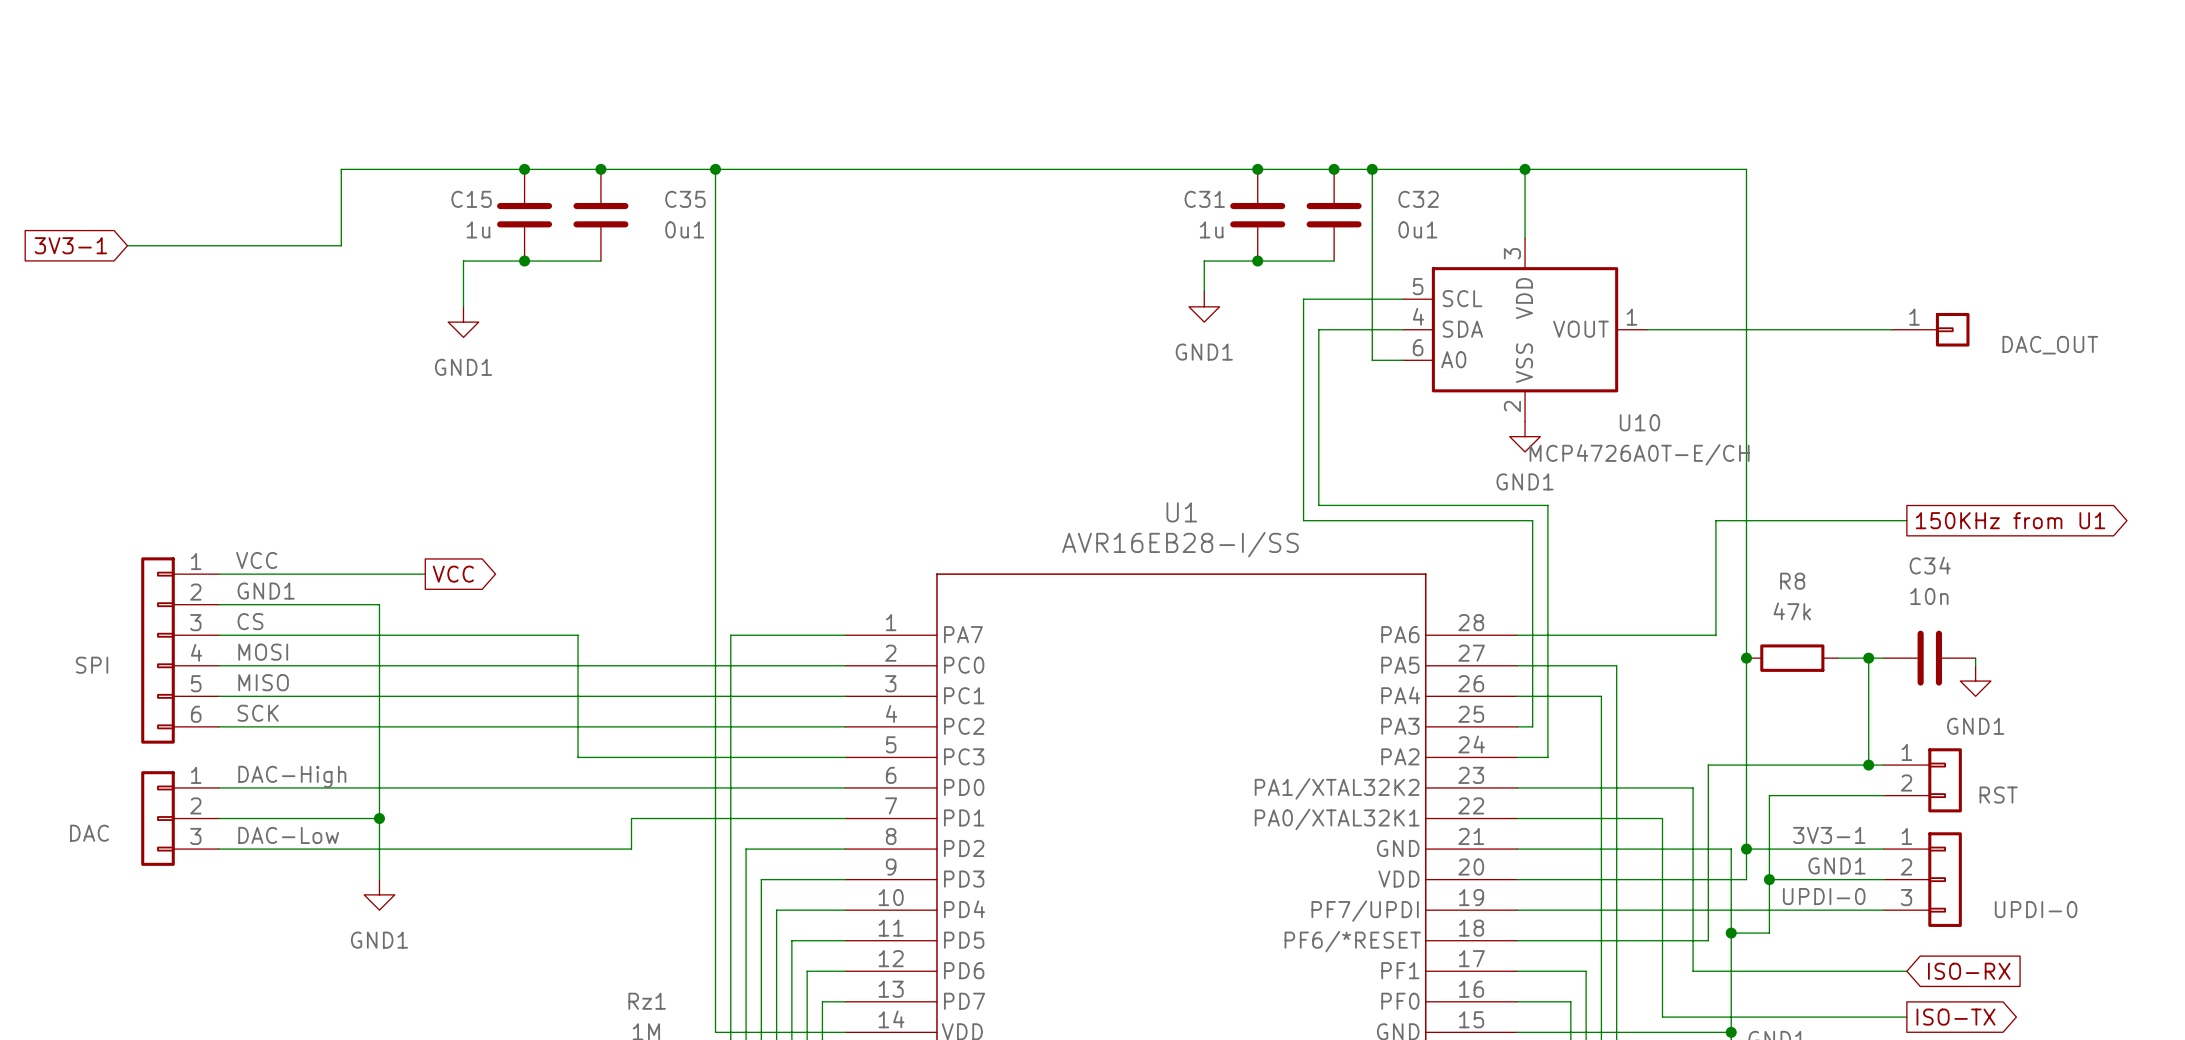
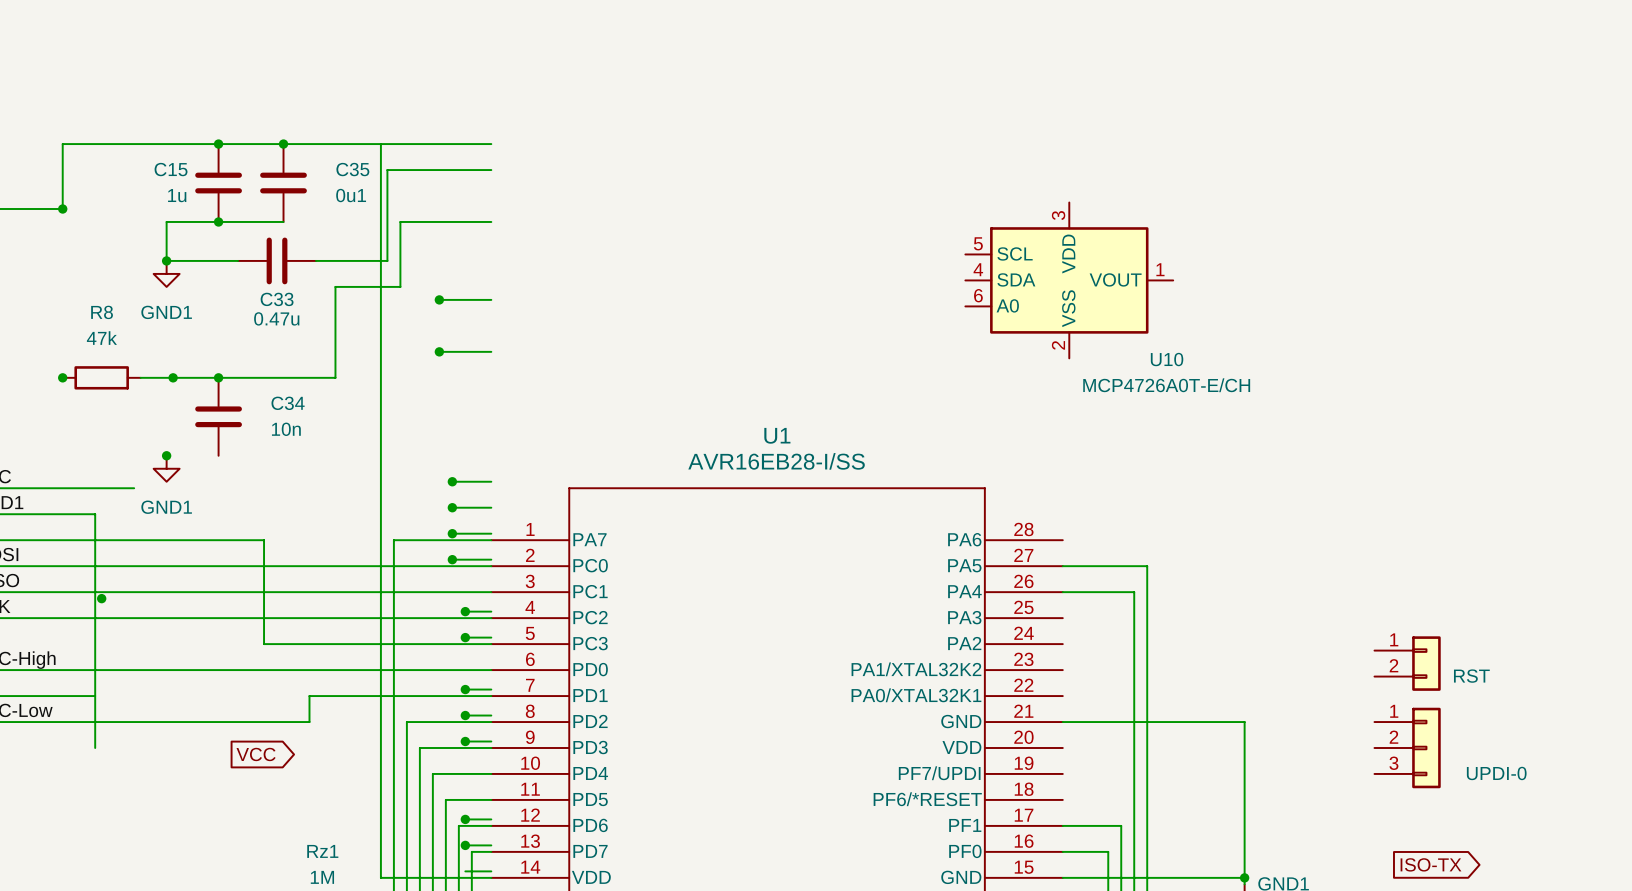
junction: (715, 169) -> none
wire: (845, 169) (1746, 169) (1746, 879) (1517, 879) -> none
junction: (1257, 169) -> none
junction: (1334, 169) -> none
wire: (1372, 169) (1372, 360) (1402, 360) -> none
junction: (1372, 169) -> none
wire: (1525, 169) (1525, 238) -> none
junction: (1525, 169) -> none
wire: none -> (491, 170) (387, 170) (387, 260) (315, 260)
C31: 1u (1257, 215) -> none
C32: 0u1 (1334, 215) -> none
junction: none -> (62, 209)
wire: none -> (491, 221) (400, 221) (400, 286) (335, 286) (335, 377) (140, 377)
junction: (1257, 261) -> none
wire: (1334, 261) (1204, 261) (1204, 291) -> none
wire: (1402, 299) (1303, 299) (1303, 520) (1532, 520) (1532, 726) (1517, 726) -> none
wire: none -> (166, 260) (238, 260)
junction: none -> (166, 260)
C33: none -> 0.47u (277, 260)
power symbol: GND1 (1204, 306) -> none
wire: (1402, 329) (1318, 329) (1318, 505) (1547, 505) (1547, 757) (1517, 757) -> none
wire: (1647, 329) (1891, 329) -> none
part: DAC_OUT (1930, 329) -> none
wire: none -> (439, 299) (491, 299)
junction: none -> (439, 299)
wire: none -> (439, 351) (491, 351)
junction: none -> (439, 351)
power symbol: GND1 (1525, 436) -> none
junction: none -> (62, 377)
junction: none -> (173, 377)
junction: none -> (218, 377)
wire: (1906, 520) (1715, 520) (1715, 635) (1517, 635) -> none
global label: 150KHz from U1 (2010, 520) -> none
junction: none -> (166, 455)
power symbol: none -> GND1 (166, 468)
wire: none -> (452, 481) (491, 481)
junction: none -> (452, 481)
global label: VCC (453, 574) -> none
C34 value position: 10n (1929, 596) -> 10n (286, 429)
wire: none -> (452, 507) (491, 507)
junction: none -> (452, 507)
wire: none -> (452, 533) (491, 533)
junction: none -> (452, 533)
wire: none -> (452, 559) (491, 559)
junction: none -> (452, 559)
junction: (1746, 658) -> none
R8 position: (1792, 658) -> (101, 377)
wire: (1838, 658) (1883, 658) -> none
wire: (1868, 658) (1868, 765) -> none
junction: (1868, 658) -> none
C34 rotation: 0° (1929, 658) -> 90° clockwise (218, 416)
C34 position: (1929, 658) -> (218, 416)
wire: (1975, 658) (1975, 665) -> none
power symbol: GND1 (1975, 681) -> none
junction: none -> (101, 598)
wire: none -> (465, 611) (491, 611)
junction: none -> (465, 611)
wire: none -> (465, 637) (491, 637)
junction: none -> (465, 637)
junction: (1868, 765) -> none
wire: (1883, 765) (1708, 765) (1708, 940) (1517, 940) -> none
wire: (1517, 787) (1693, 787) (1693, 971) (1906, 971) -> none
wire: (1883, 795) (1769, 795) (1769, 933) (1731, 933) -> none
wire: none -> (465, 689) (491, 689)
junction: none -> (465, 689)
junction: (379, 818) -> none
wire: (1517, 818) (1662, 818) (1662, 1017) (1906, 1017) -> none
label: 3V3-1 (1829, 835) -> none
wire: none -> (465, 715) (491, 715)
junction: none -> (465, 715)
wire: (1746, 849) (1883, 849) -> none
junction: (1746, 849) -> none
label: GND1 (1836, 865) -> none
wire: none -> (465, 741) (491, 741)
junction: none -> (465, 741)
wire: (1769, 879) (1883, 879) -> none
junction: (1769, 879) -> none
global label: none -> VCC (256, 754)
power symbol: GND1 (379, 894) -> none
label: UPDI-0 (1824, 896) -> none
wire: (1517, 910) (1883, 910) -> none
junction: (1731, 933) -> none
wire: none -> (465, 819) (491, 819)
junction: none -> (465, 819)
global label: ISO-RX (1969, 971) -> none
wire: none -> (465, 845) (491, 845)
junction: none -> (465, 845)
wire: none -> (465, 871) (491, 871)

